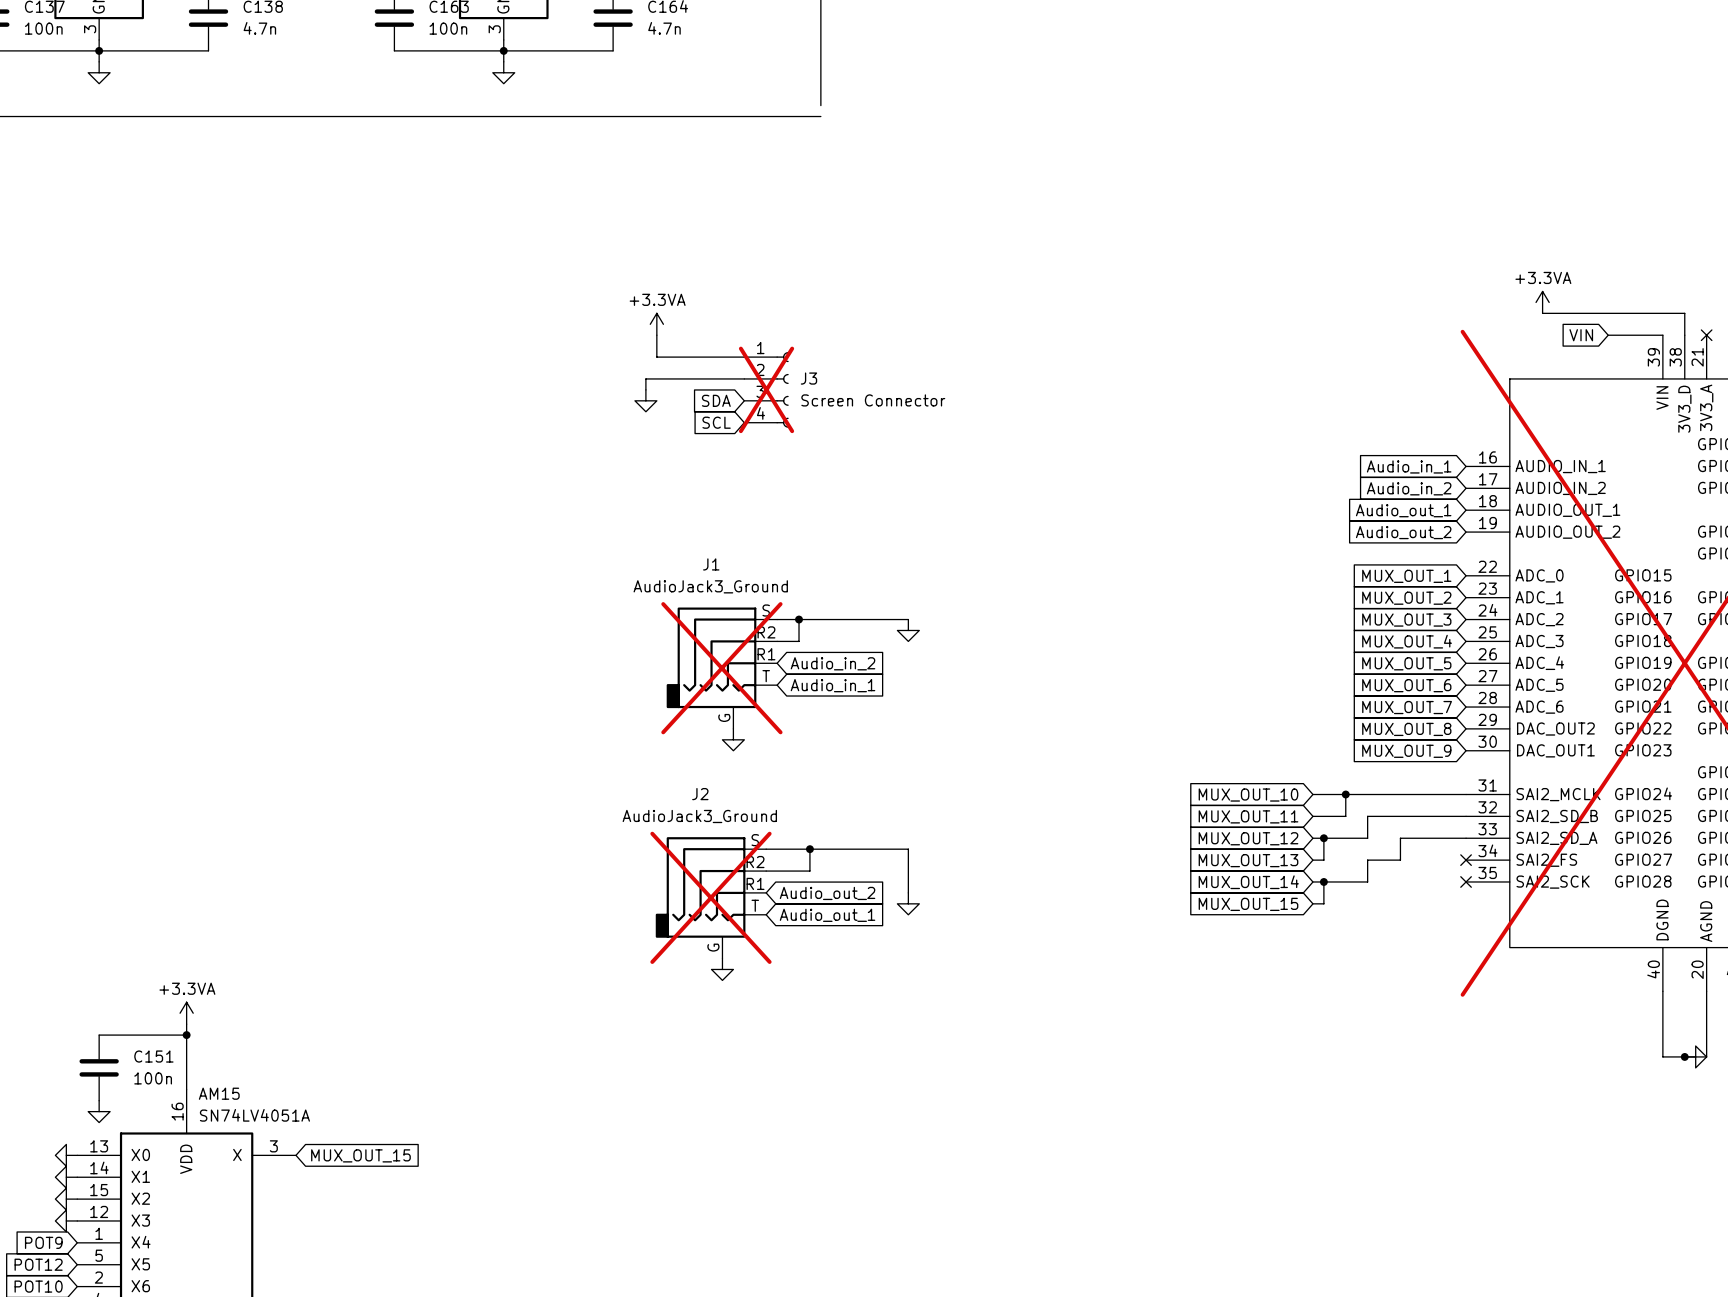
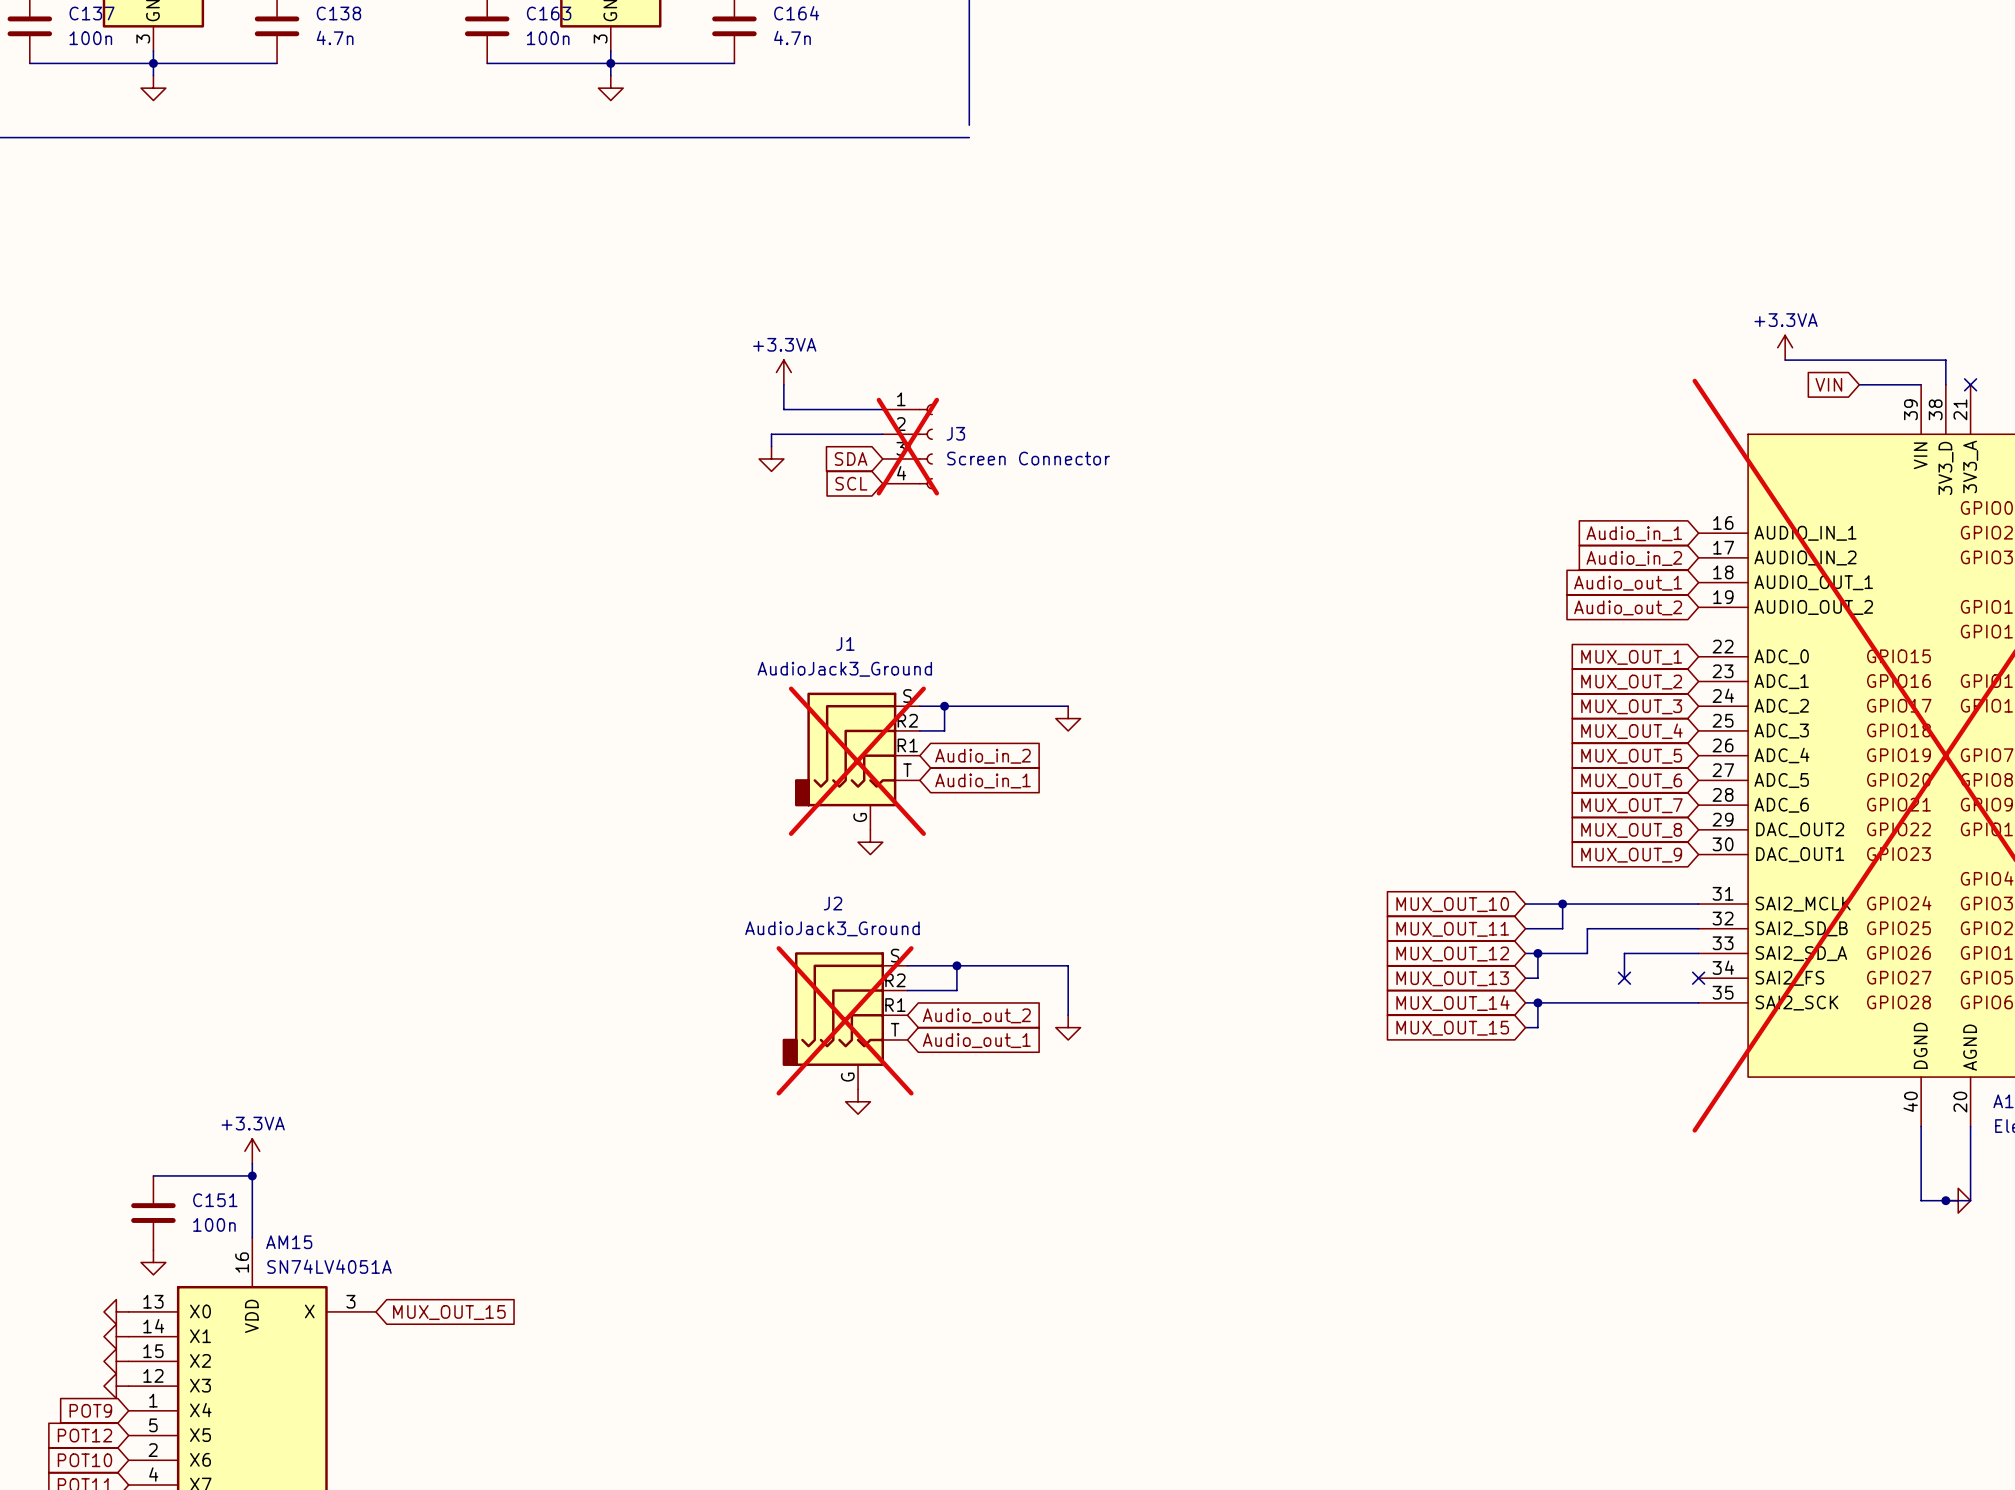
wire: (1400, 860) (1367, 860) (1367, 881) -> (1698, 1002) (1587, 1002)
no-connect mark: none -> (1624, 978)
no-connect mark: (1466, 881) -> none

